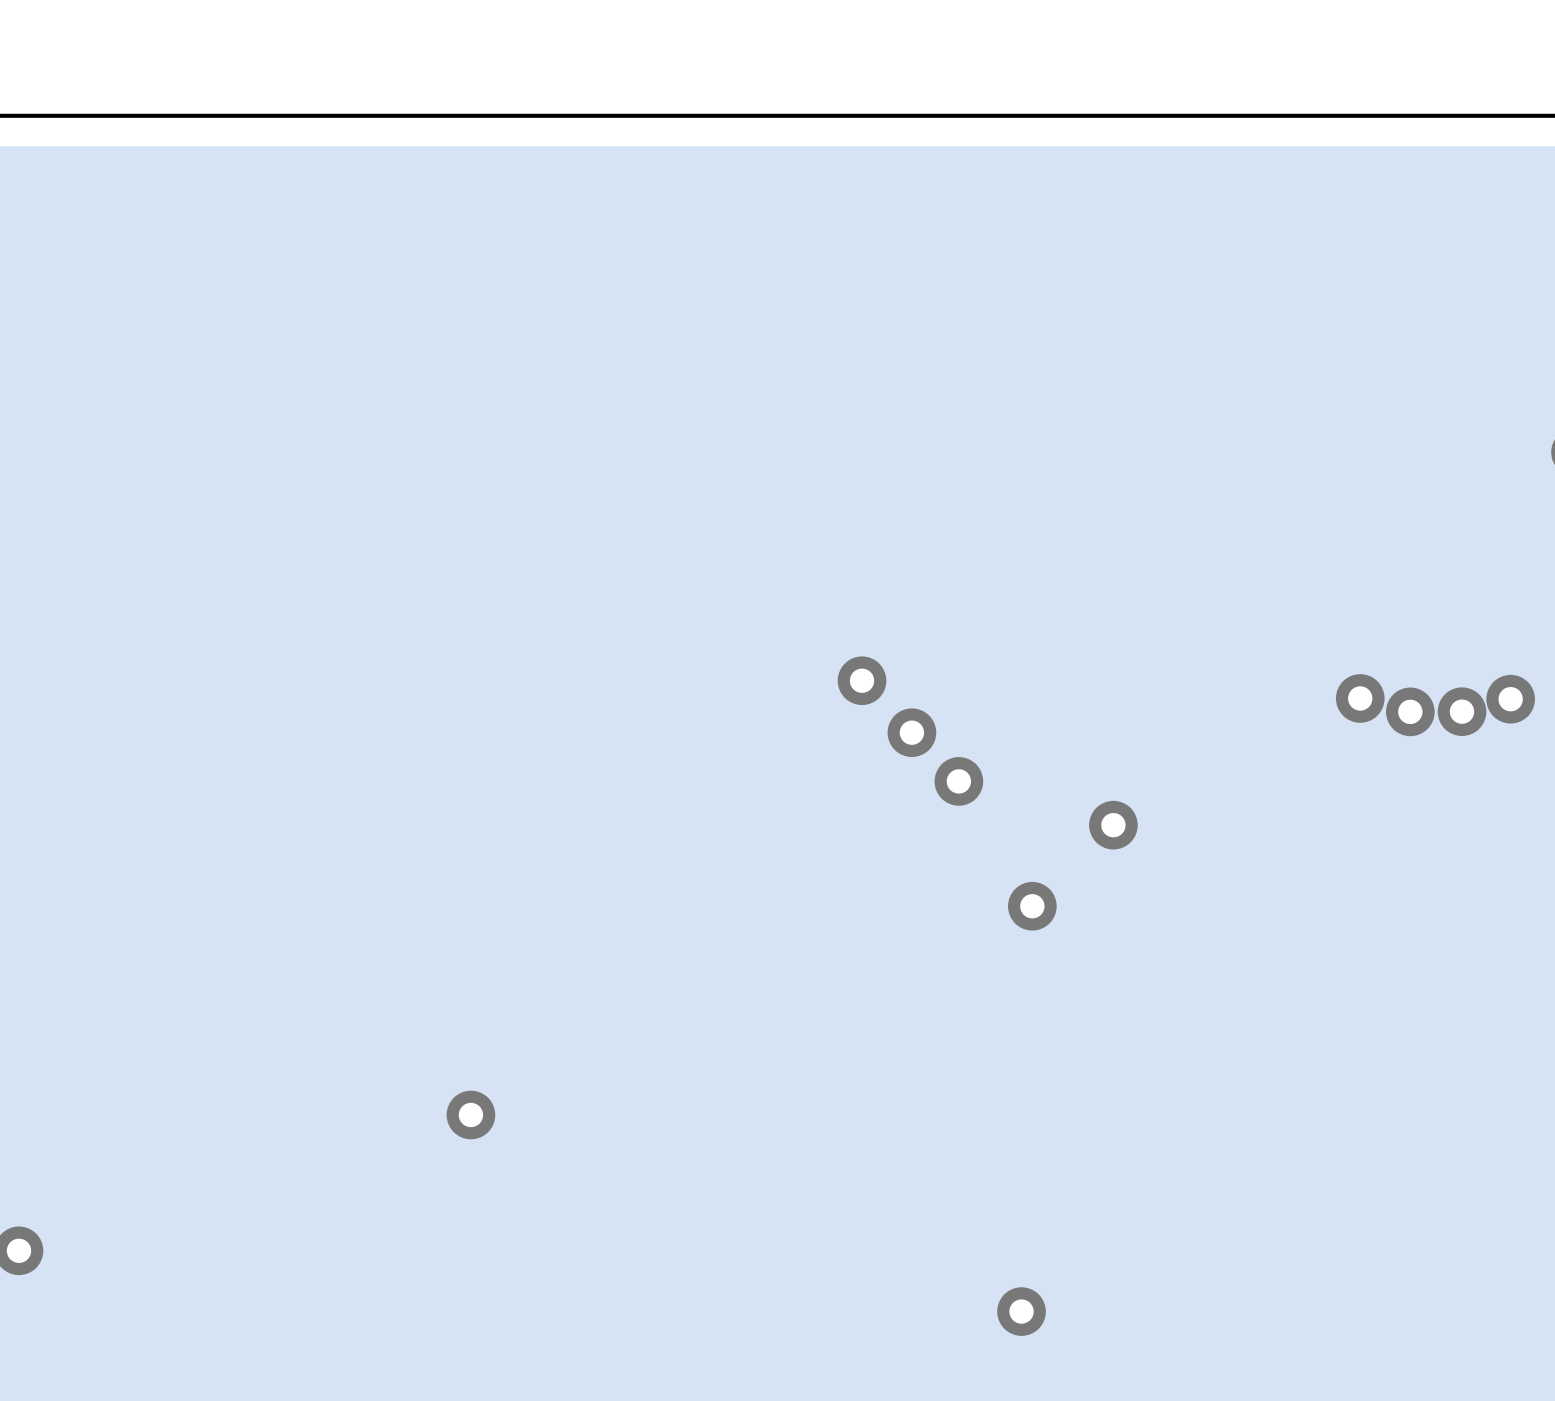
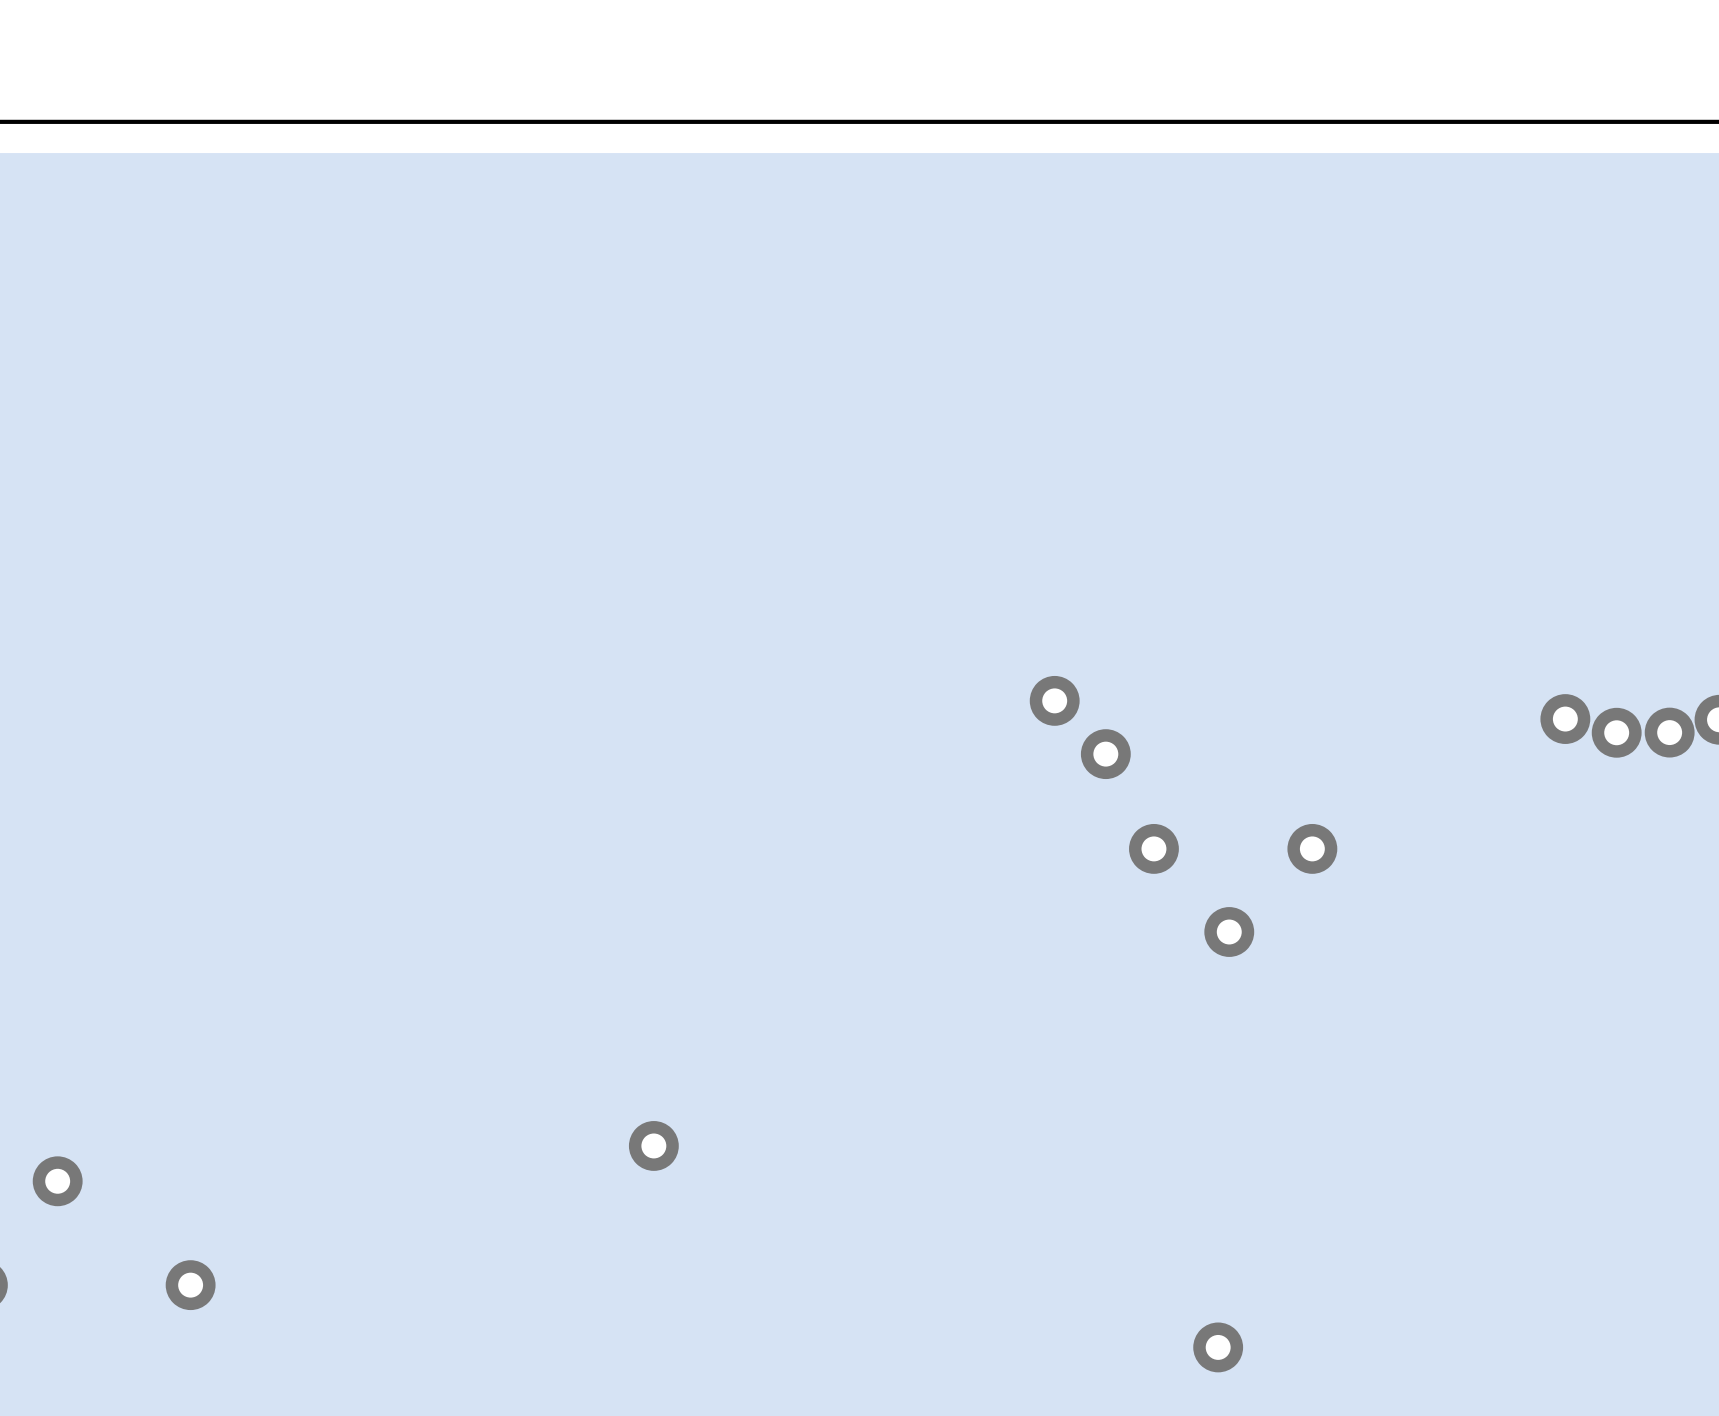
via position: (958, 781) -> (1153, 848)

